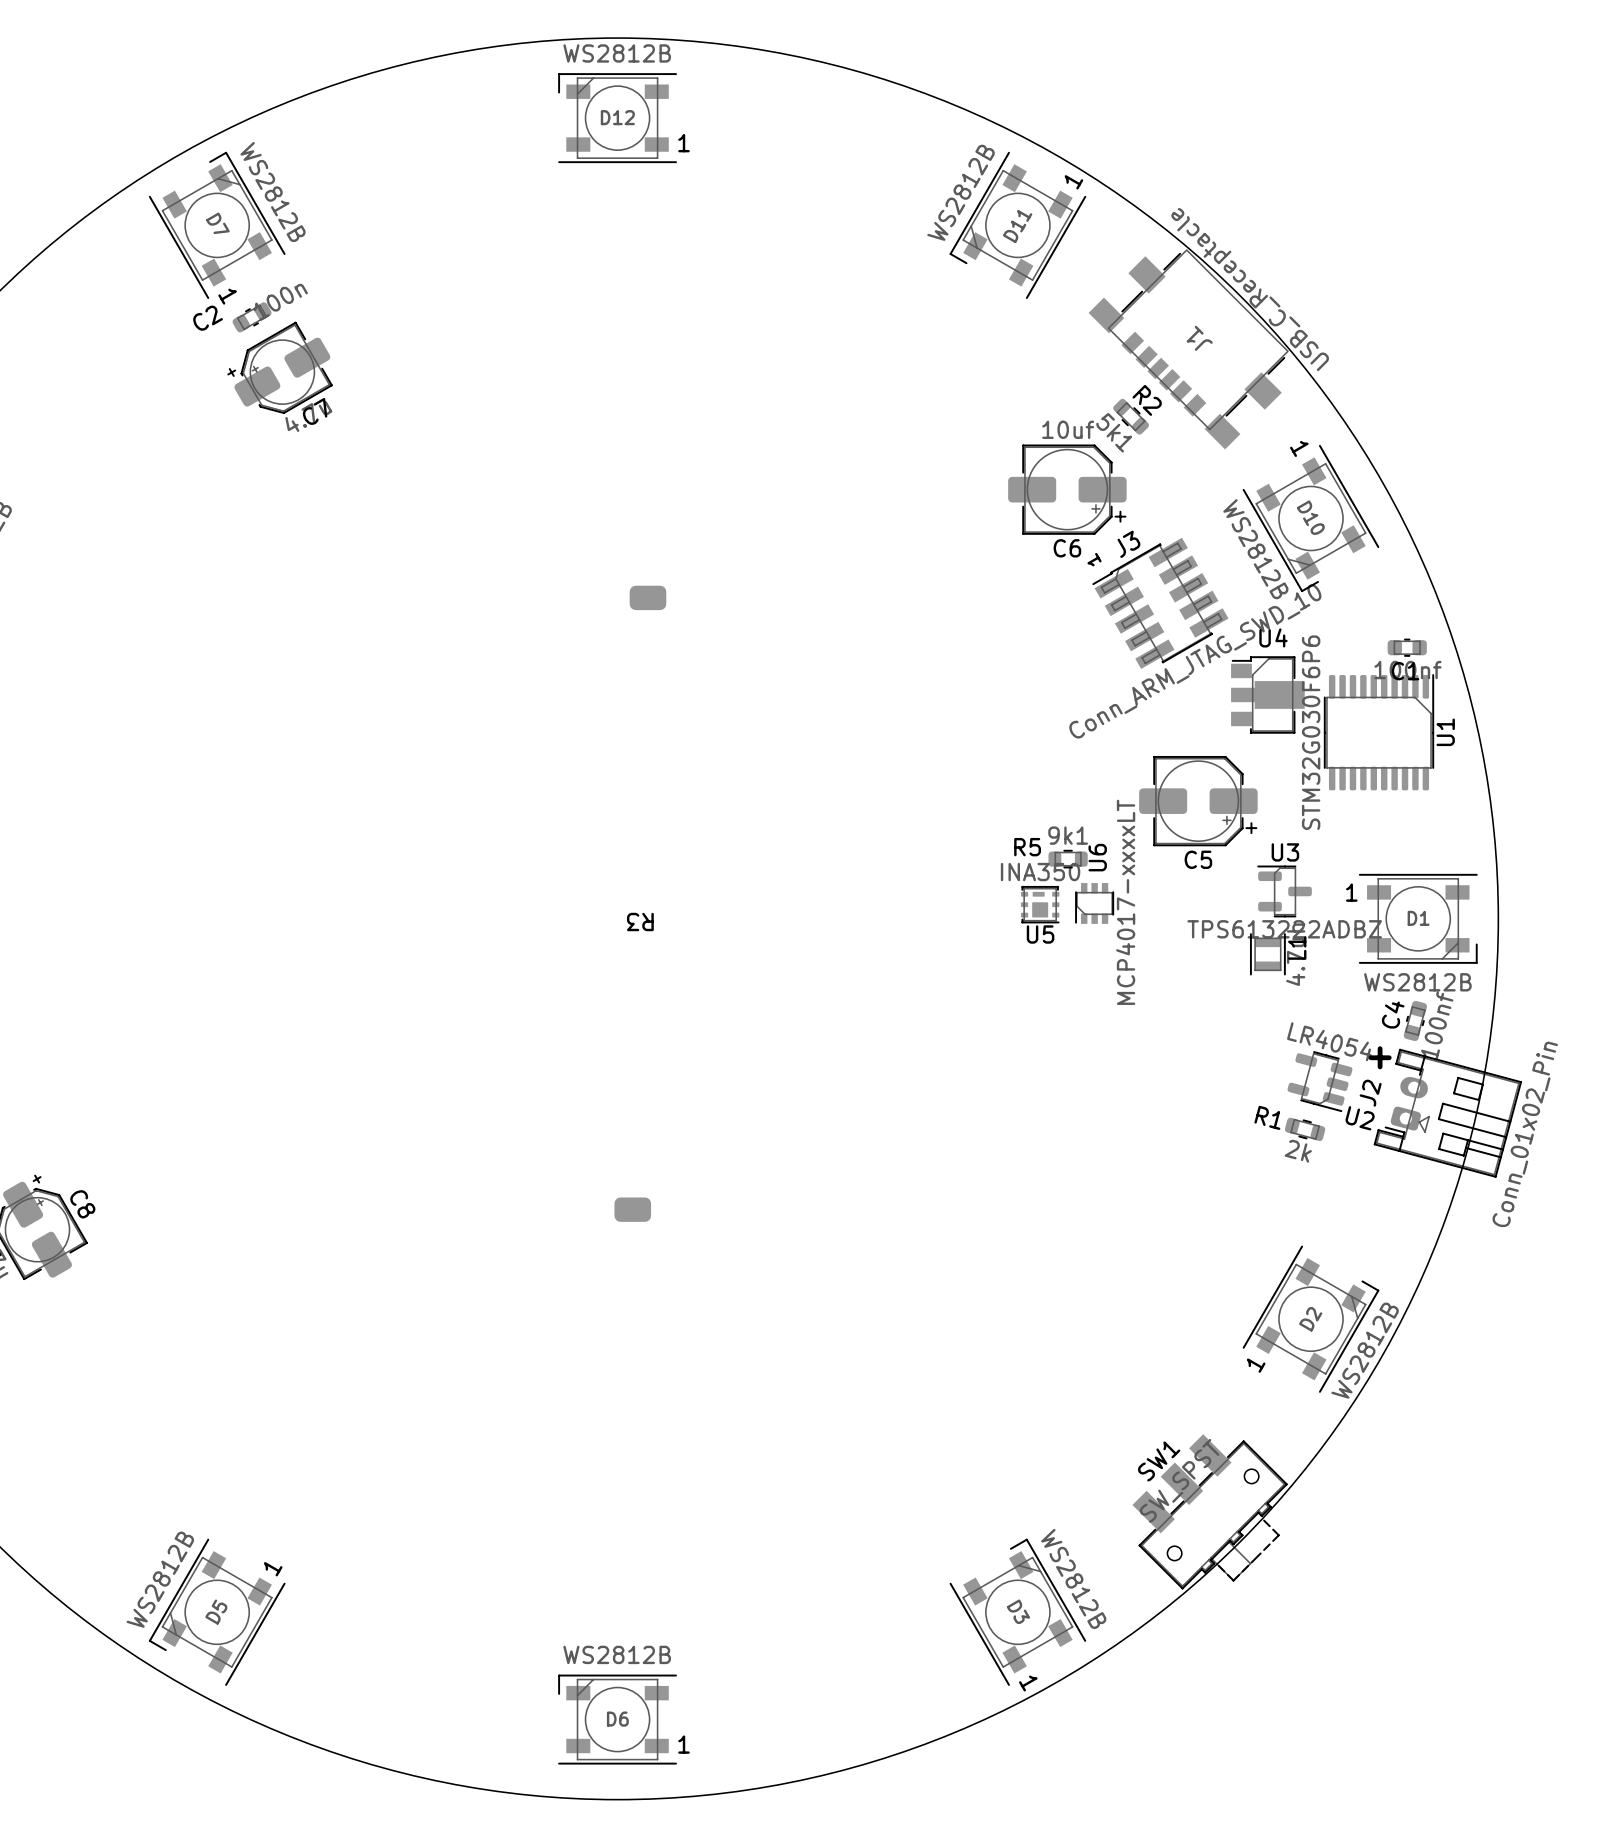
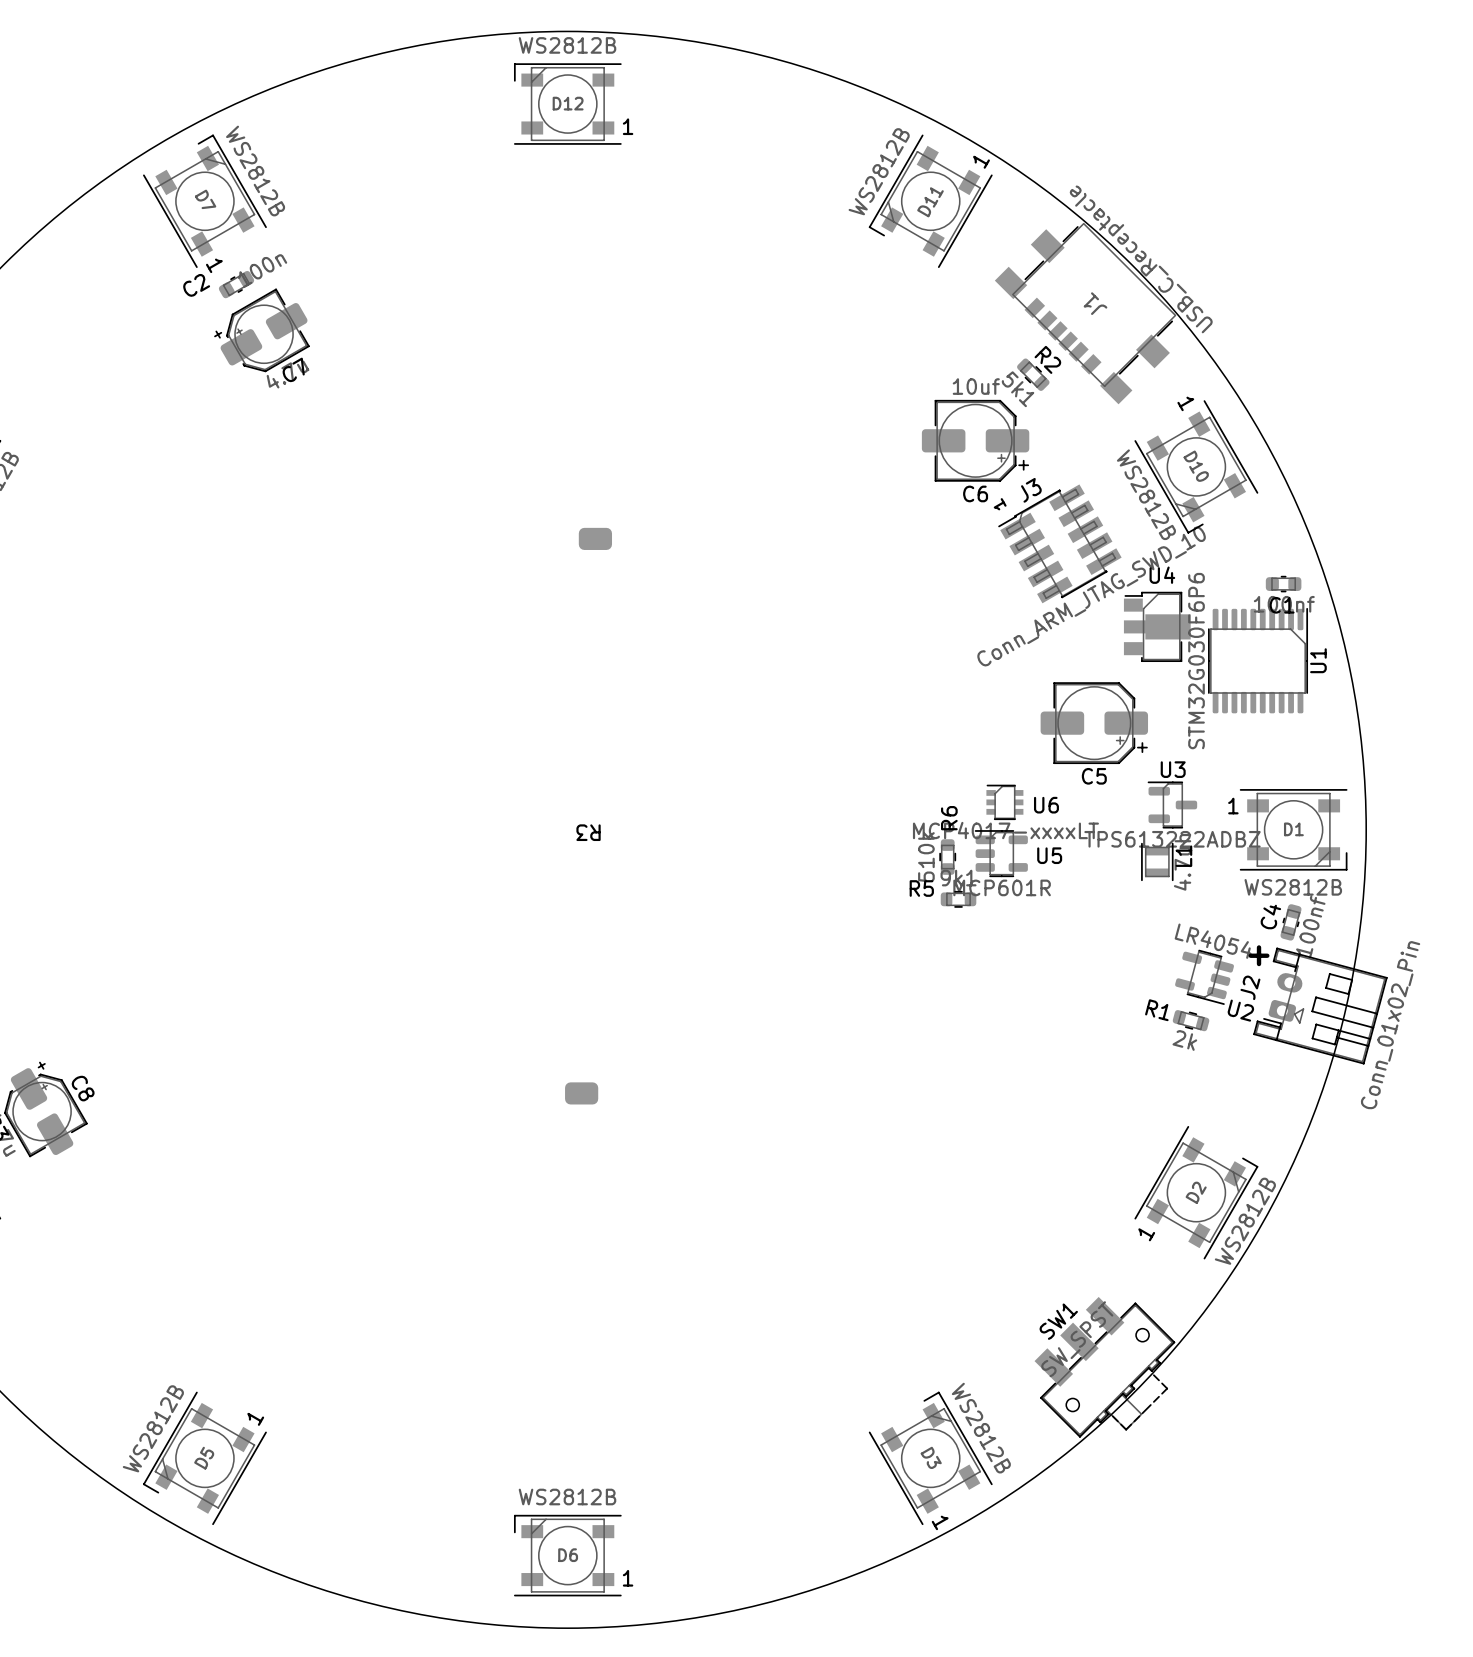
R5 position: (1068, 859) -> (958, 899)
U5 value: INA350 (1040, 872) -> MCP601R (1002, 887)
U5 footprint: [1020, 885, 1060, 924] -> [974, 830, 1028, 878]
U6 rotation: 0° (1094, 903) -> 90° clockwise (1004, 802)
U5 name position: U5 (1040, 934) -> U5 (1049, 855)
R6: none -> 510k (947, 857)

